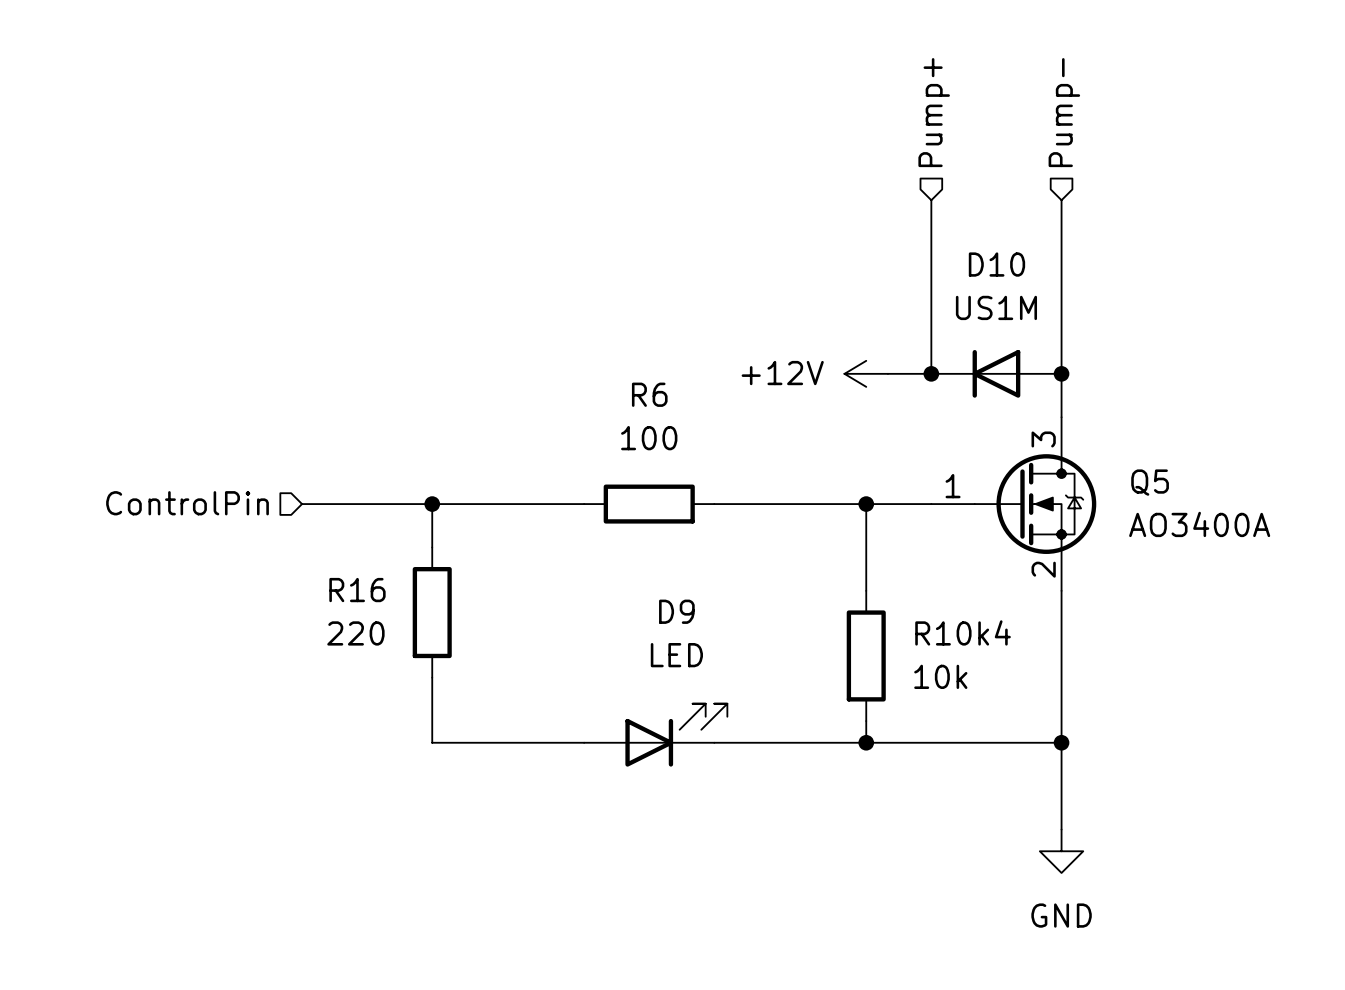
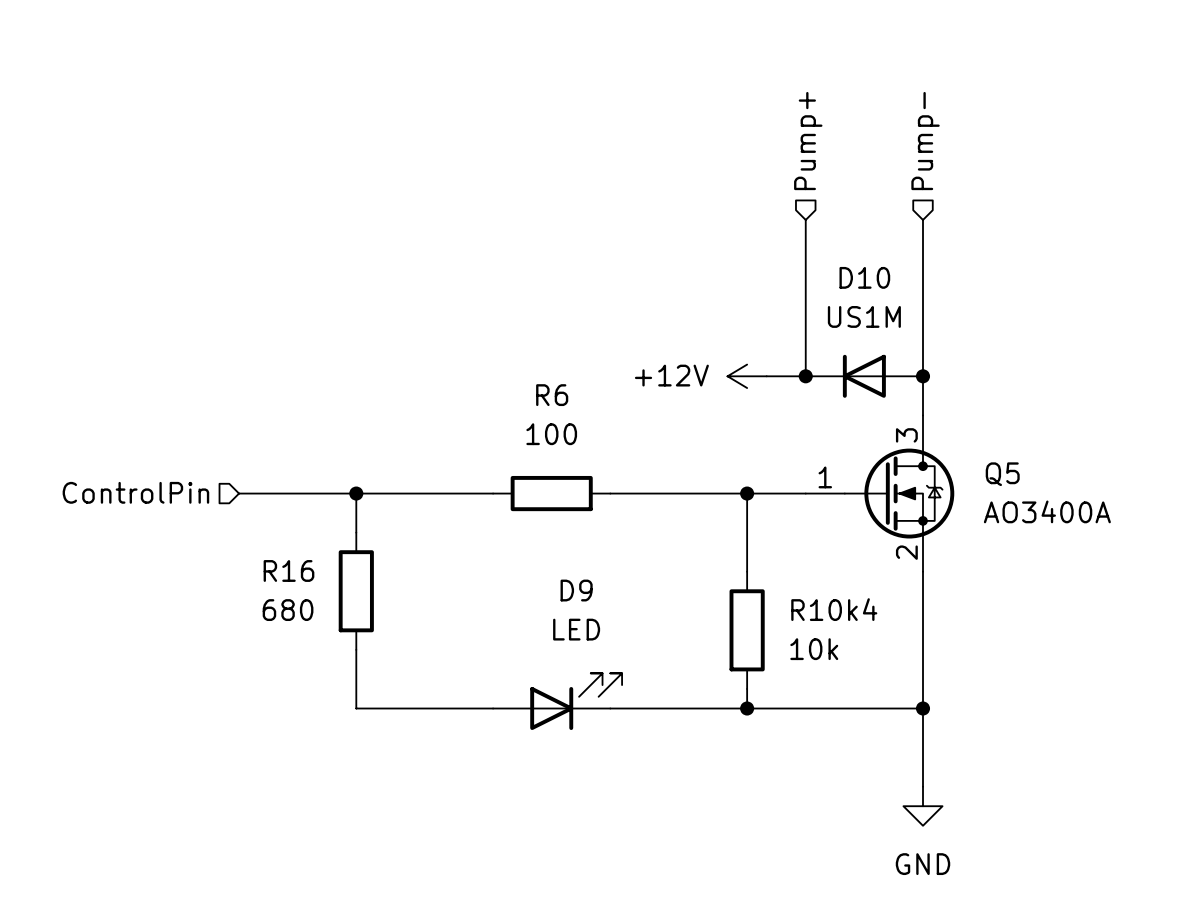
R16 value: 220 (355, 633) -> 680 (288, 610)

